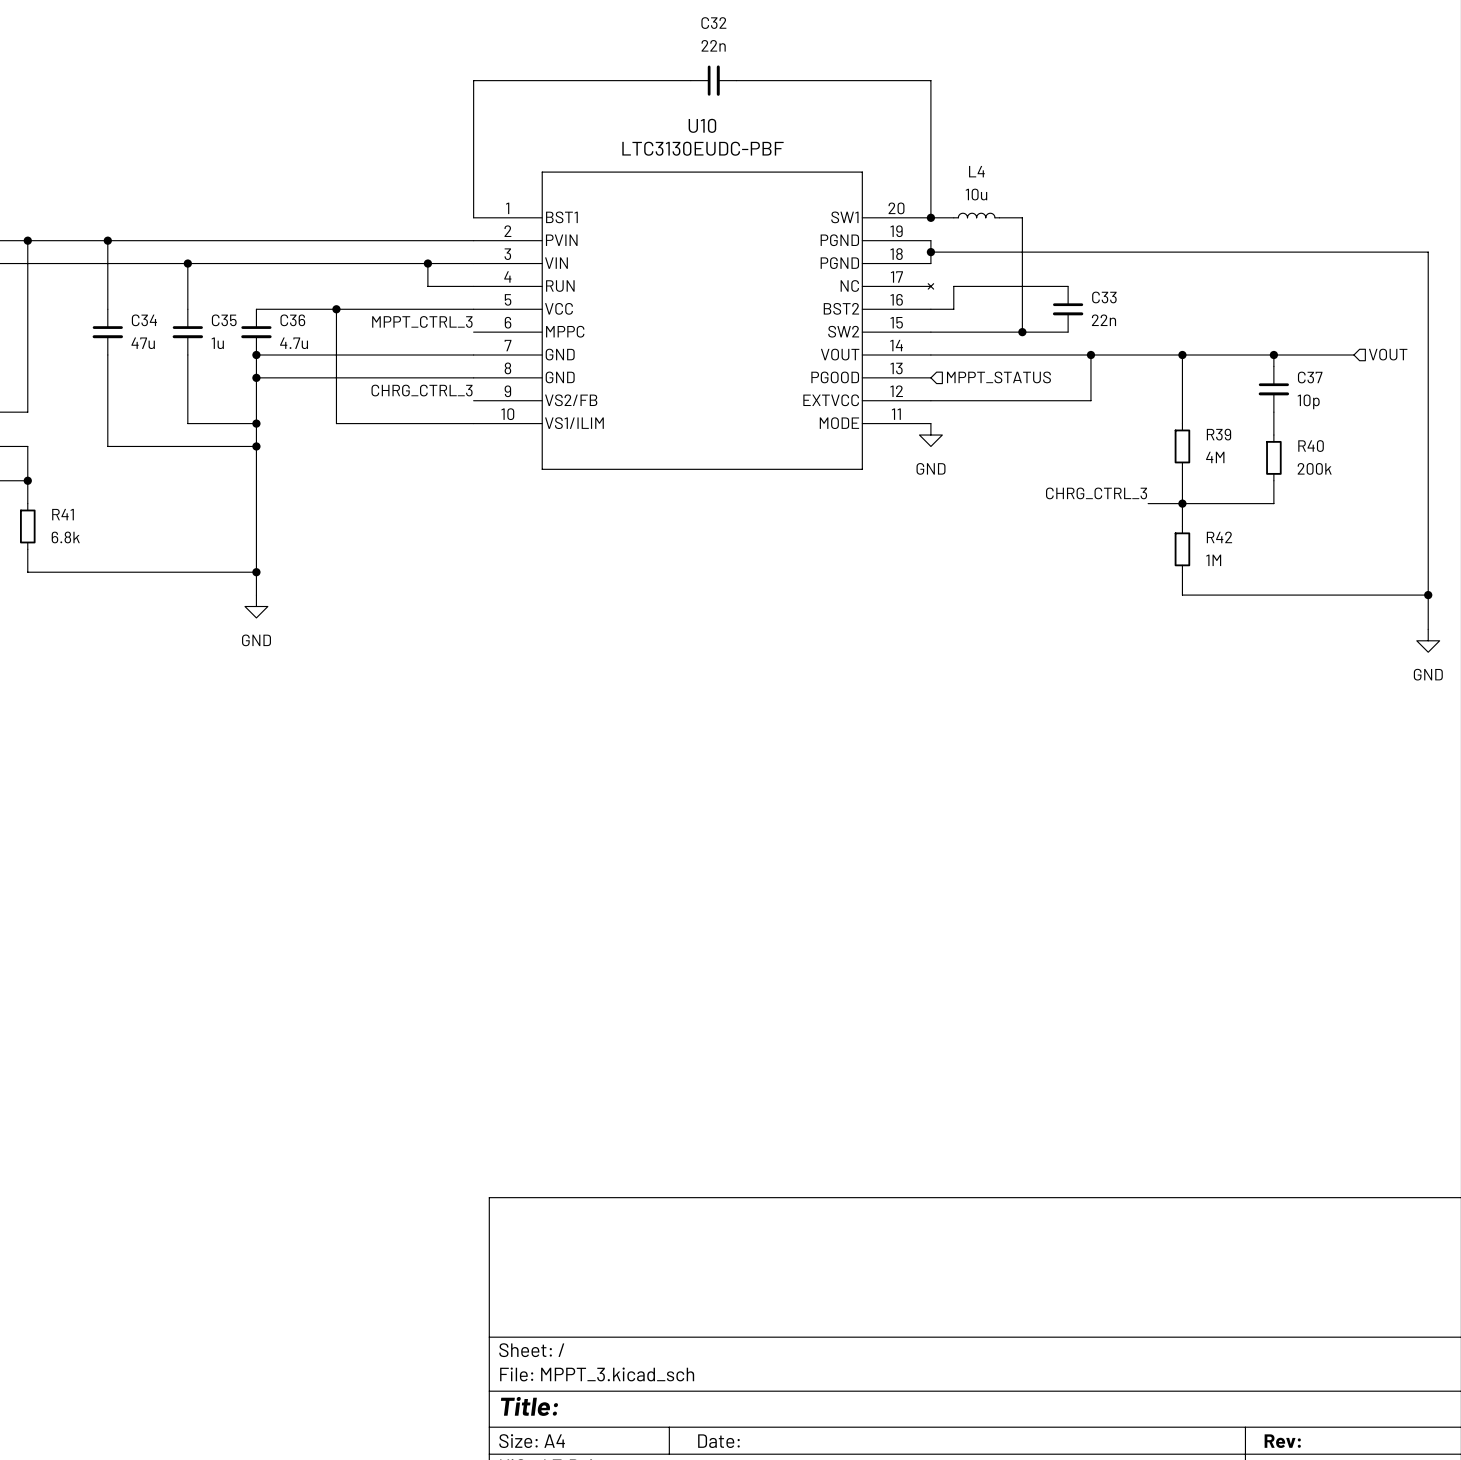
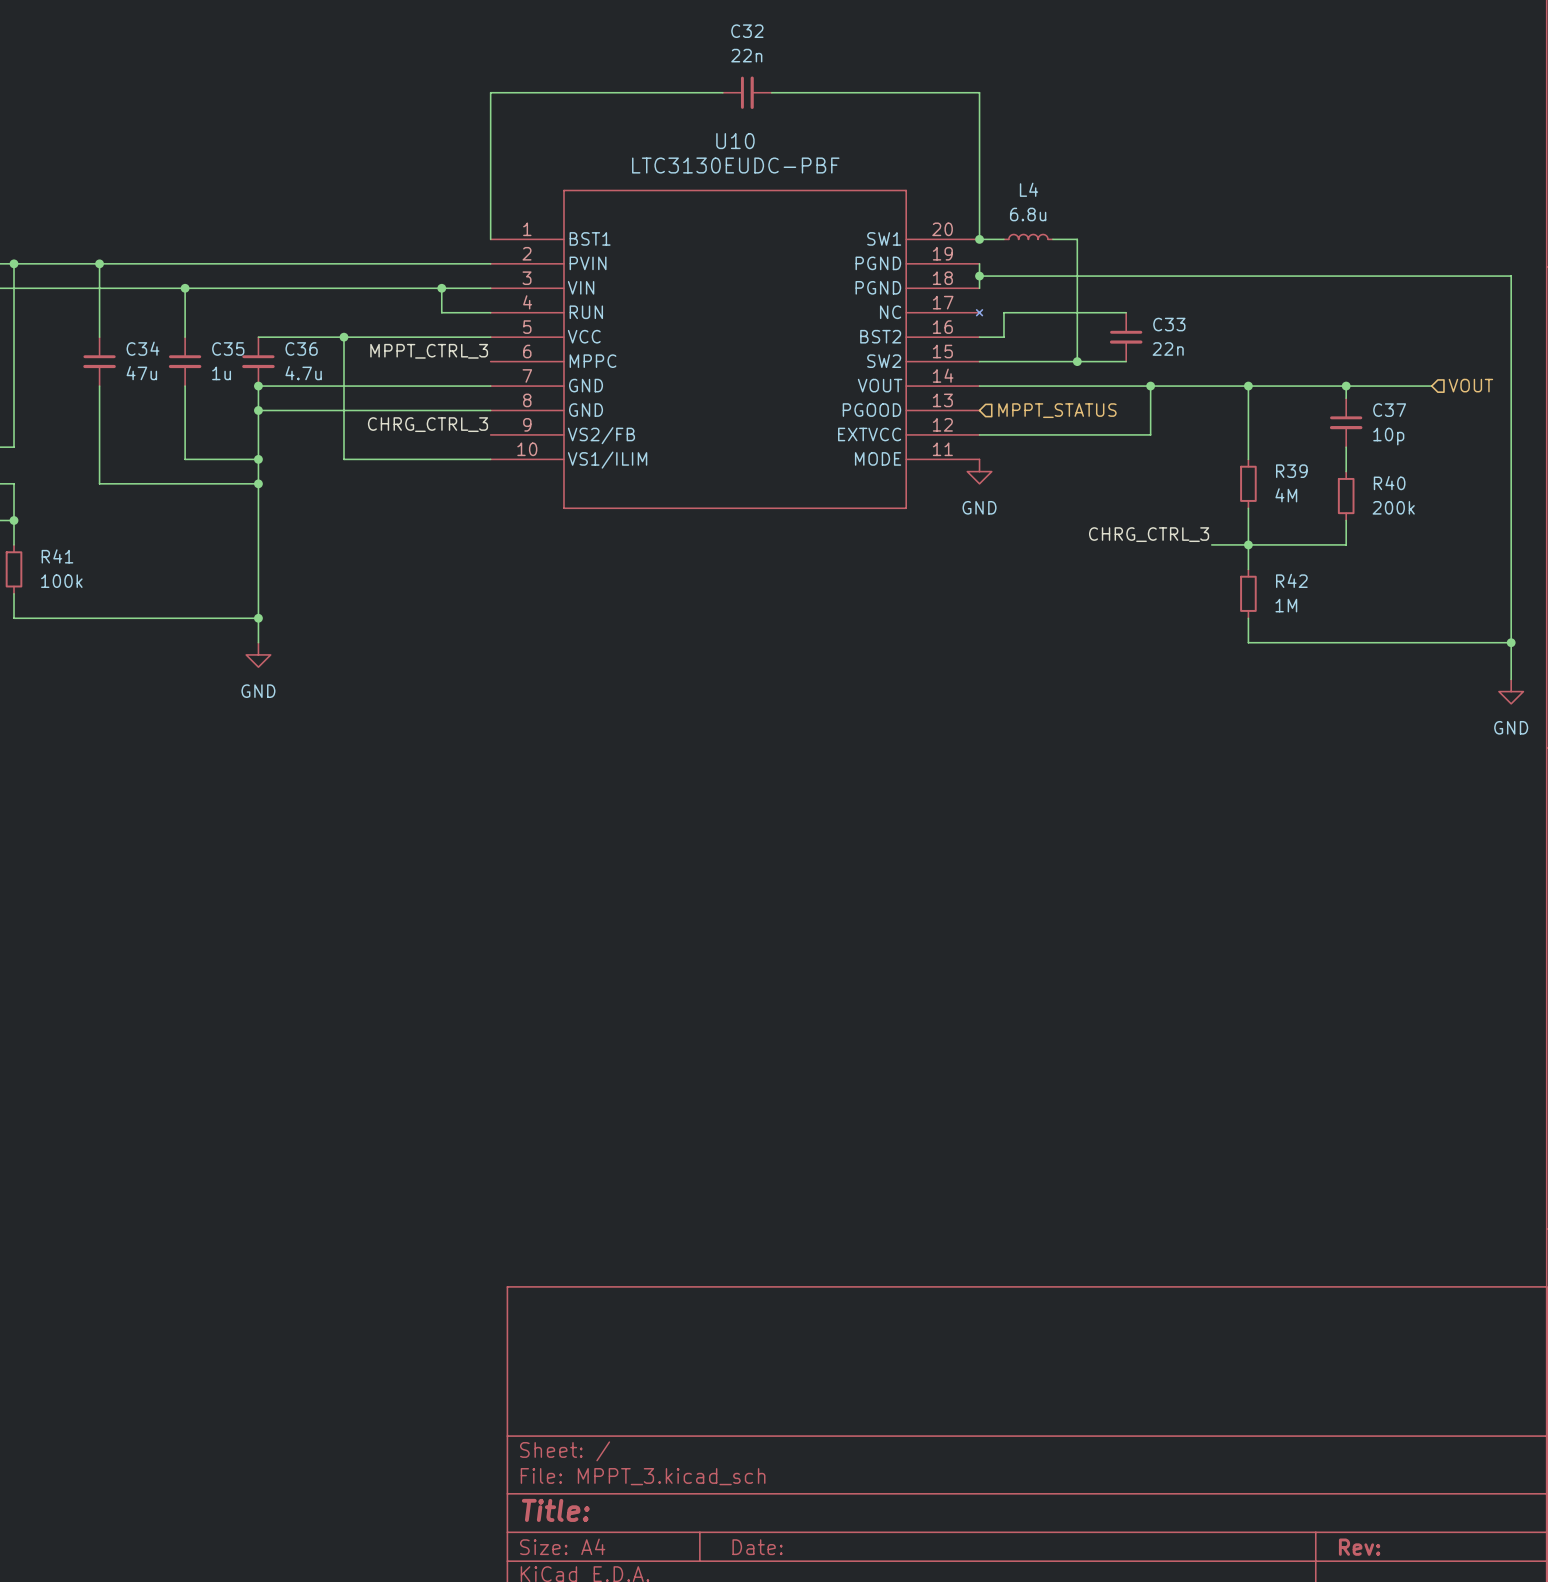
L4 value: 10u (976, 194) -> 6.8u (1028, 214)
R41 value: 6.8k (65, 537) -> 100k (61, 581)

